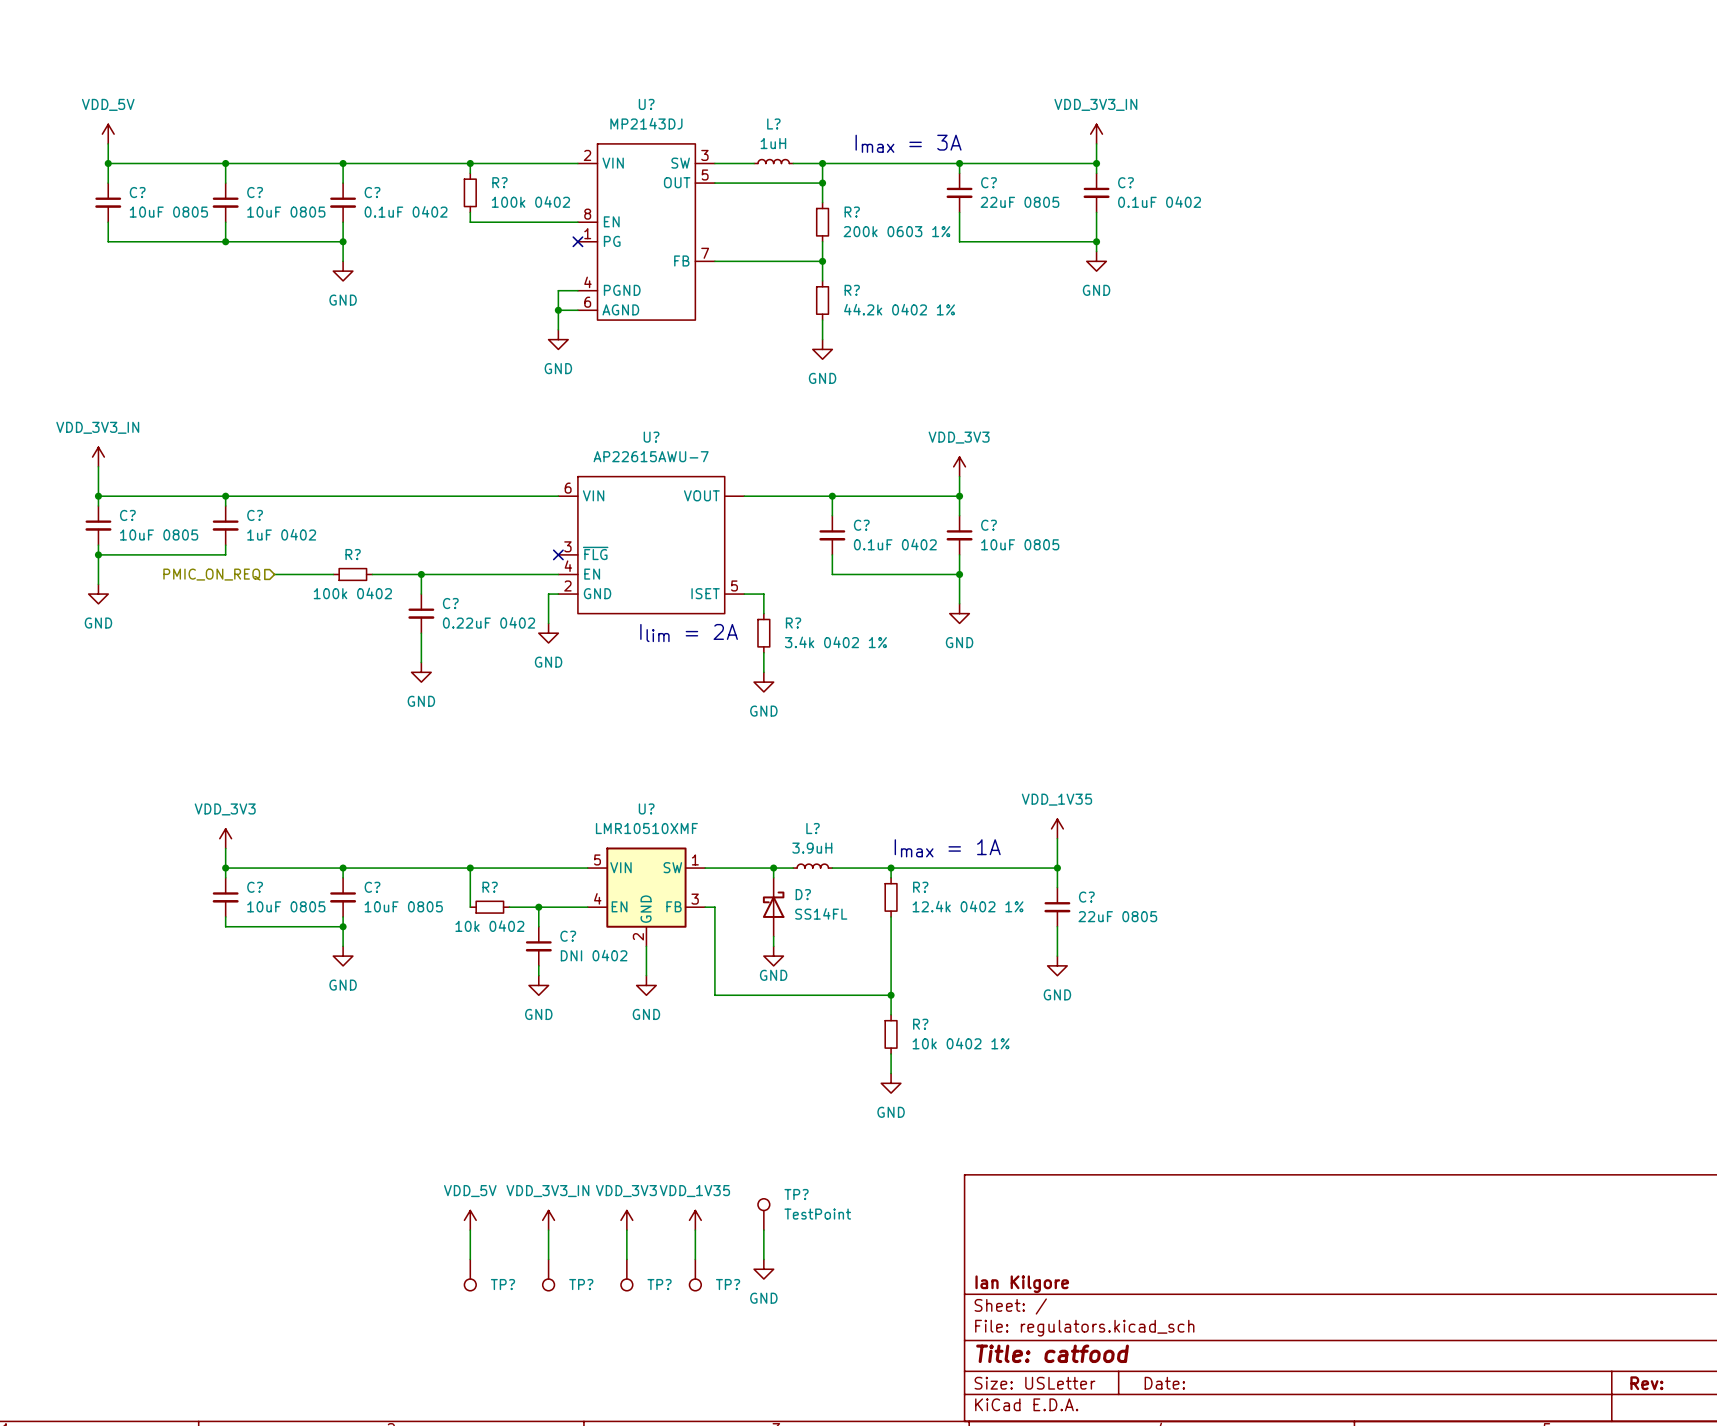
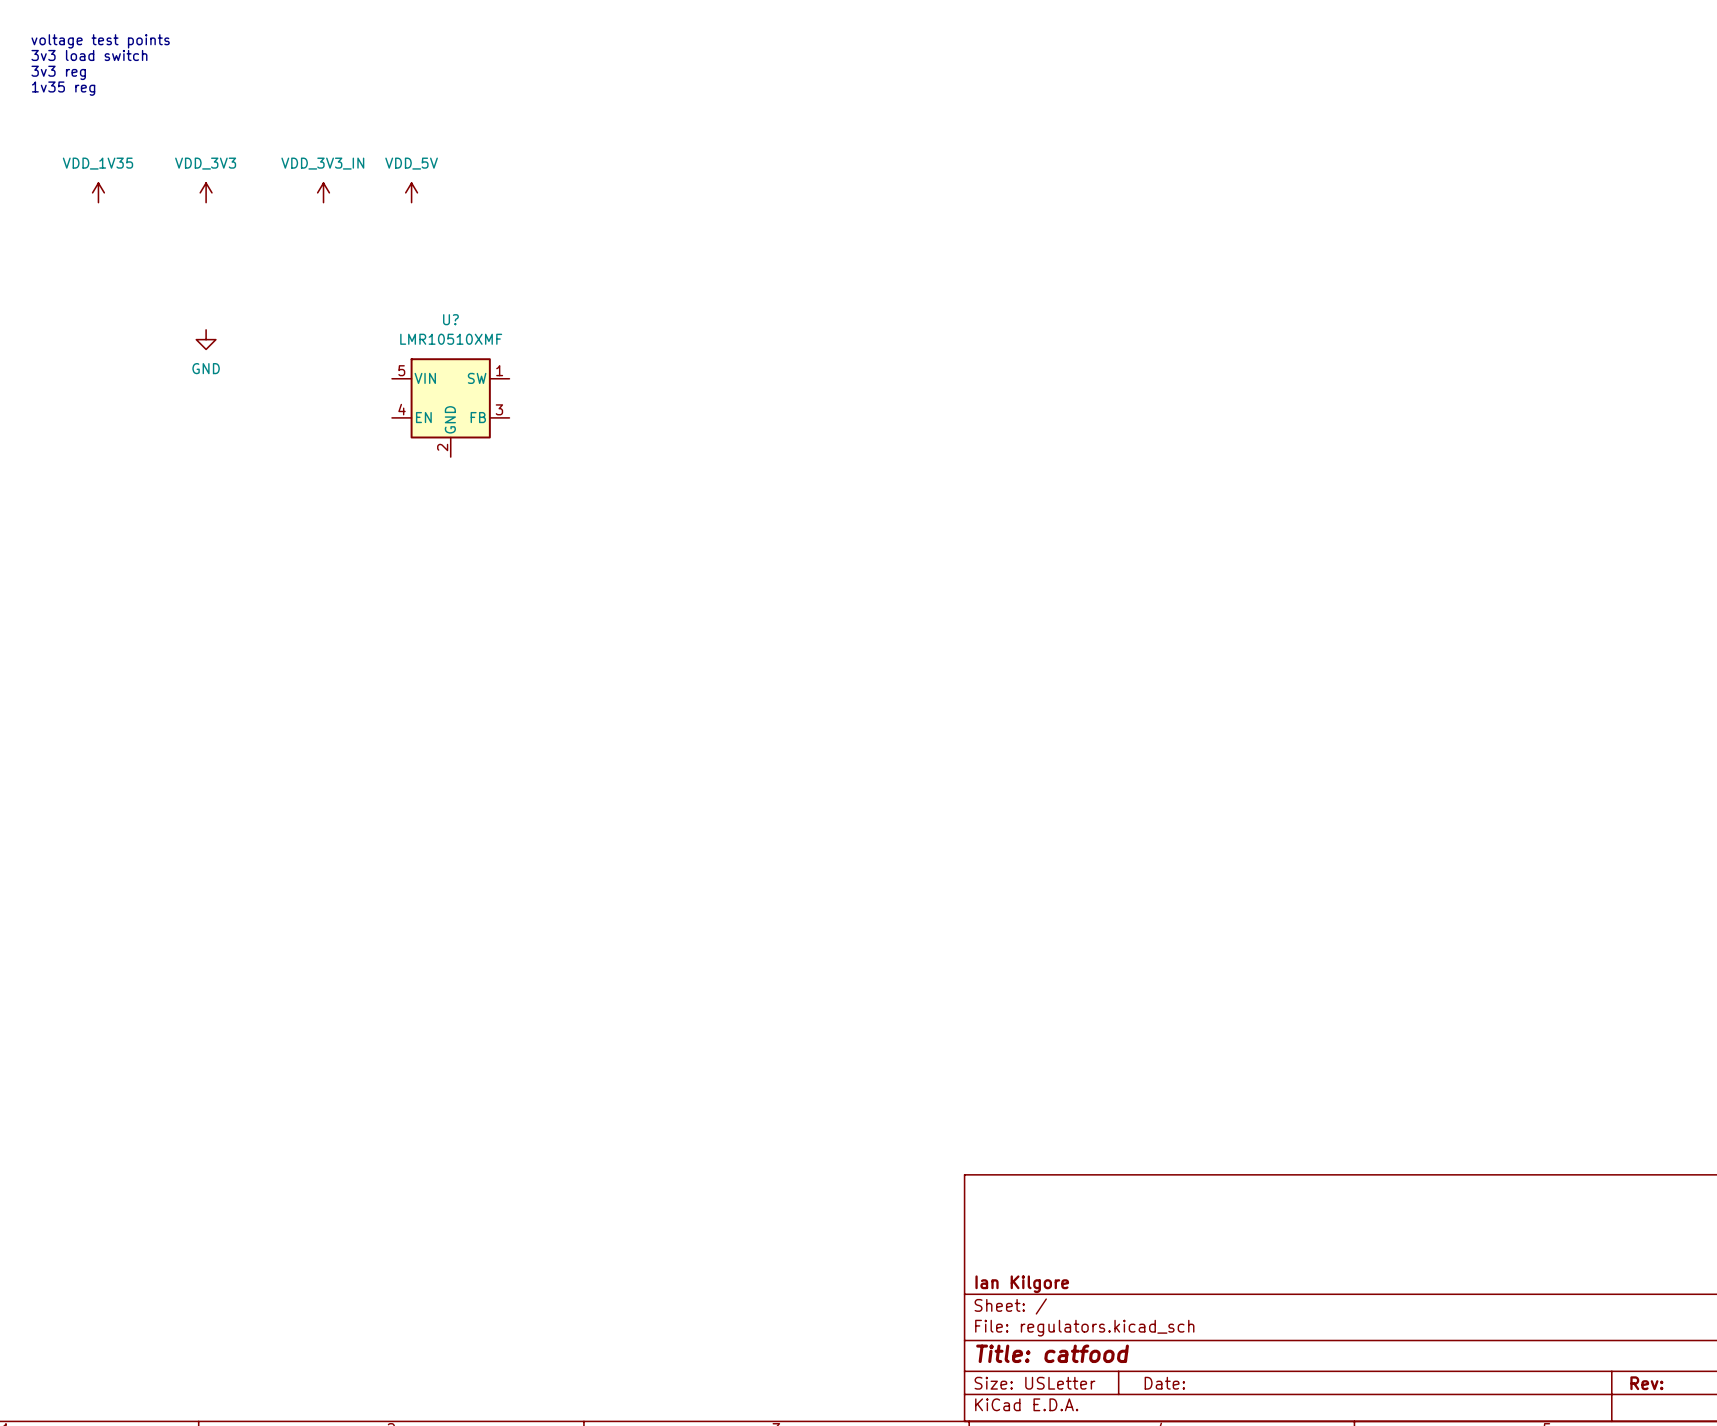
text: none -> voltage test points (100, 41)
text: none -> 3v3 load switch (89, 55)
text: none -> 3v3 reg (58, 72)
text: none -> 1v35 reg (63, 88)
power symbol: VDD_5V (108, 134) -> none
power symbol: VDD_3V3_IN (1096, 134) -> none
wire: (108, 143) (108, 183) -> none
text: Imax = 3A (908, 143) -> none
wire: (1096, 143) (1096, 173) -> none
L?: 1uH (773, 161) -> none
wire: (108, 163) (577, 163) -> none
junction: (108, 163) -> none
wire: (225, 163) (225, 183) -> none
junction: (225, 163) -> none
wire: (343, 163) (343, 183) -> none
junction: (343, 163) -> none
wire: (470, 163) (470, 173) -> none
junction: (470, 163) -> none
wire: (714, 163) (754, 163) -> none
wire: (793, 163) (1096, 163) -> none
wire: (822, 163) (822, 202) -> none
junction: (822, 163) -> none
wire: (959, 163) (959, 173) -> none
junction: (959, 163) -> none
junction: (1096, 163) -> none
wire: (714, 183) (822, 183) -> none
junction: (822, 183) -> none
power symbol: none -> VDD_1V35 (98, 192)
power symbol: none -> VDD_3V3 (206, 192)
power symbol: none -> VDD_3V3_IN (323, 192)
power symbol: none -> VDD_5V (411, 192)
R?: 100k 0402 (470, 192) -> none
C?: 22uF 0805 (959, 192) -> none
C?: 0.1uF 0402 (1096, 192) -> none
C?: 10uF 0805 (108, 202) -> none
C?: 10uF 0805 (225, 202) -> none
C?: 0.1uF 0402 (343, 202) -> none
wire: (470, 212) (470, 222) (577, 222) -> none
wire: (959, 212) (959, 241) (1096, 241) -> none
wire: (1096, 212) (1096, 251) -> none
wire: (108, 222) (108, 241) (343, 241) -> none
wire: (225, 222) (225, 241) -> none
wire: (343, 222) (343, 261) -> none
R?: 200k 0603 1% (822, 222) -> none
U?: MP2143DJ (646, 231) -> none
junction: (225, 241) -> none
junction: (343, 241) -> none
no-connect mark: (577, 241) -> none
wire: (822, 241) (822, 280) -> none
junction: (1096, 241) -> none
wire: (714, 261) (822, 261) -> none
junction: (822, 261) -> none
power symbol: GND (1096, 261) -> none
power symbol: GND (343, 271) -> none
wire: (577, 290) (558, 290) (558, 329) -> none
R?: 44.2k 0402 1% (822, 300) -> none
wire: (558, 310) (577, 310) -> none
junction: (558, 310) -> none
wire: (822, 320) (822, 339) -> none
power symbol: none -> GND (206, 339)
power symbol: GND (558, 339) -> none
power symbol: GND (822, 349) -> none
U?: none -> LMR10510XMF (450, 407)
power symbol: VDD_3V3_IN (98, 457) -> none
wire: (98, 466) (98, 505) -> none
power symbol: VDD_3V3 (959, 466) -> none
wire: (959, 476) (959, 515) -> none
wire: (98, 496) (558, 496) -> none
junction: (98, 496) -> none
wire: (225, 496) (225, 505) -> none
junction: (225, 496) -> none
wire: (744, 496) (959, 496) -> none
wire: (832, 496) (832, 515) -> none
junction: (832, 496) -> none
junction: (959, 496) -> none
C?: 10uF 0805 (98, 525) -> none
C?: 1uF 0402 (225, 525) -> none
C?: 0.1uF 0402 (832, 535) -> none
C?: 10uF 0805 (959, 535) -> none
wire: (98, 545) (98, 584) -> none
wire: (225, 545) (225, 554) (98, 554) -> none
U?: AP22615AWU-7 (651, 545) -> none
junction: (98, 554) -> none
no-connect mark: (558, 554) -> none
wire: (832, 554) (832, 574) (959, 574) -> none
wire: (959, 554) (959, 603) -> none
hierarchical label: PMIC_ON_REQ (212, 574) -> none
wire: (274, 574) (333, 574) -> none
R?: 100k 0402 (352, 574) -> none
wire: (372, 574) (558, 574) -> none
wire: (421, 574) (421, 594) -> none
junction: (421, 574) -> none
junction: (959, 574) -> none
power symbol: GND (98, 594) -> none
wire: (558, 594) (548, 594) (548, 623) -> none
wire: (744, 594) (763, 594) (763, 613) -> none
C?: 0.22uF 0402 (421, 613) -> none
power symbol: GND (959, 613) -> none
wire: (421, 633) (421, 662) -> none
power symbol: GND (548, 633) -> none
text: Ilim = 2A (689, 633) -> none
R?: 3.4k 0402 1% (763, 633) -> none
wire: (763, 652) (763, 672) -> none
power symbol: GND (421, 672) -> none
power symbol: GND (763, 682) -> none
power symbol: VDD_1V35 (1057, 828) -> none
power symbol: VDD_3V3 (225, 838) -> none
wire: (1057, 838) (1057, 887) -> none
wire: (225, 848) (225, 877) -> none
text: Imax = 1A (947, 848) -> none
L?: 3.9uH (812, 866) -> none
wire: (225, 868) (587, 868) -> none
junction: (225, 868) -> none
wire: (343, 868) (343, 877) -> none
junction: (343, 868) -> none
wire: (470, 868) (470, 907) -> none
junction: (470, 868) -> none
wire: (705, 868) (793, 868) -> none
wire: (773, 868) (773, 877) -> none
junction: (773, 868) -> none
wire: (832, 868) (1057, 868) -> none
wire: (891, 868) (891, 877) -> none
junction: (891, 868) -> none
junction: (1057, 868) -> none
U?: LMR10510XMF (646, 896) -> none
C?: 10uF 0805 (225, 897) -> none
C?: 10uF 0805 (343, 897) -> none
R?: 12.4k 0402 1% (891, 897) -> none
R?: 10k 0402 (489, 907) -> none
wire: (509, 907) (587, 907) -> none
wire: (538, 907) (538, 926) -> none
junction: (538, 907) -> none
wire: (705, 907) (714, 907) (714, 995) (891, 995) -> none
D?: SS14FL (773, 907) -> none
C?: 22uF 0805 (1057, 907) -> none
wire: (225, 916) (225, 926) (343, 926) -> none
wire: (343, 916) (343, 946) -> none
wire: (891, 916) (891, 1014) -> none
junction: (343, 926) -> none
wire: (1057, 926) (1057, 956) -> none
wire: (773, 936) (773, 946) -> none
C?: DNI 0402 (538, 946) -> none
wire: (646, 946) (646, 975) -> none
power symbol: GND (343, 956) -> none
power symbol: GND (773, 956) -> none
wire: (538, 965) (538, 975) -> none
power symbol: GND (1057, 965) -> none
power symbol: GND (538, 985) -> none
power symbol: GND (646, 985) -> none
junction: (891, 995) -> none
R?: 10k 0402 1% (891, 1034) -> none
wire: (891, 1053) (891, 1073) -> none
power symbol: GND (891, 1083) -> none
TP?: TestPoint (763, 1214) -> none
power symbol: VDD_5V (470, 1220) -> none
power symbol: VDD_3V3_IN (548, 1220) -> none
power symbol: VDD_3V3 (626, 1220) -> none
power symbol: VDD_1V35 (695, 1220) -> none
wire: (470, 1230) (470, 1259) -> none
wire: (548, 1230) (548, 1259) -> none
wire: (626, 1230) (626, 1259) -> none
wire: (695, 1230) (695, 1259) -> none
wire: (763, 1230) (763, 1259) -> none
power symbol: GND (763, 1269) -> none
TP?: (470, 1275) -> none
TP?: (548, 1275) -> none
TP?: (626, 1275) -> none
TP?: (695, 1275) -> none

